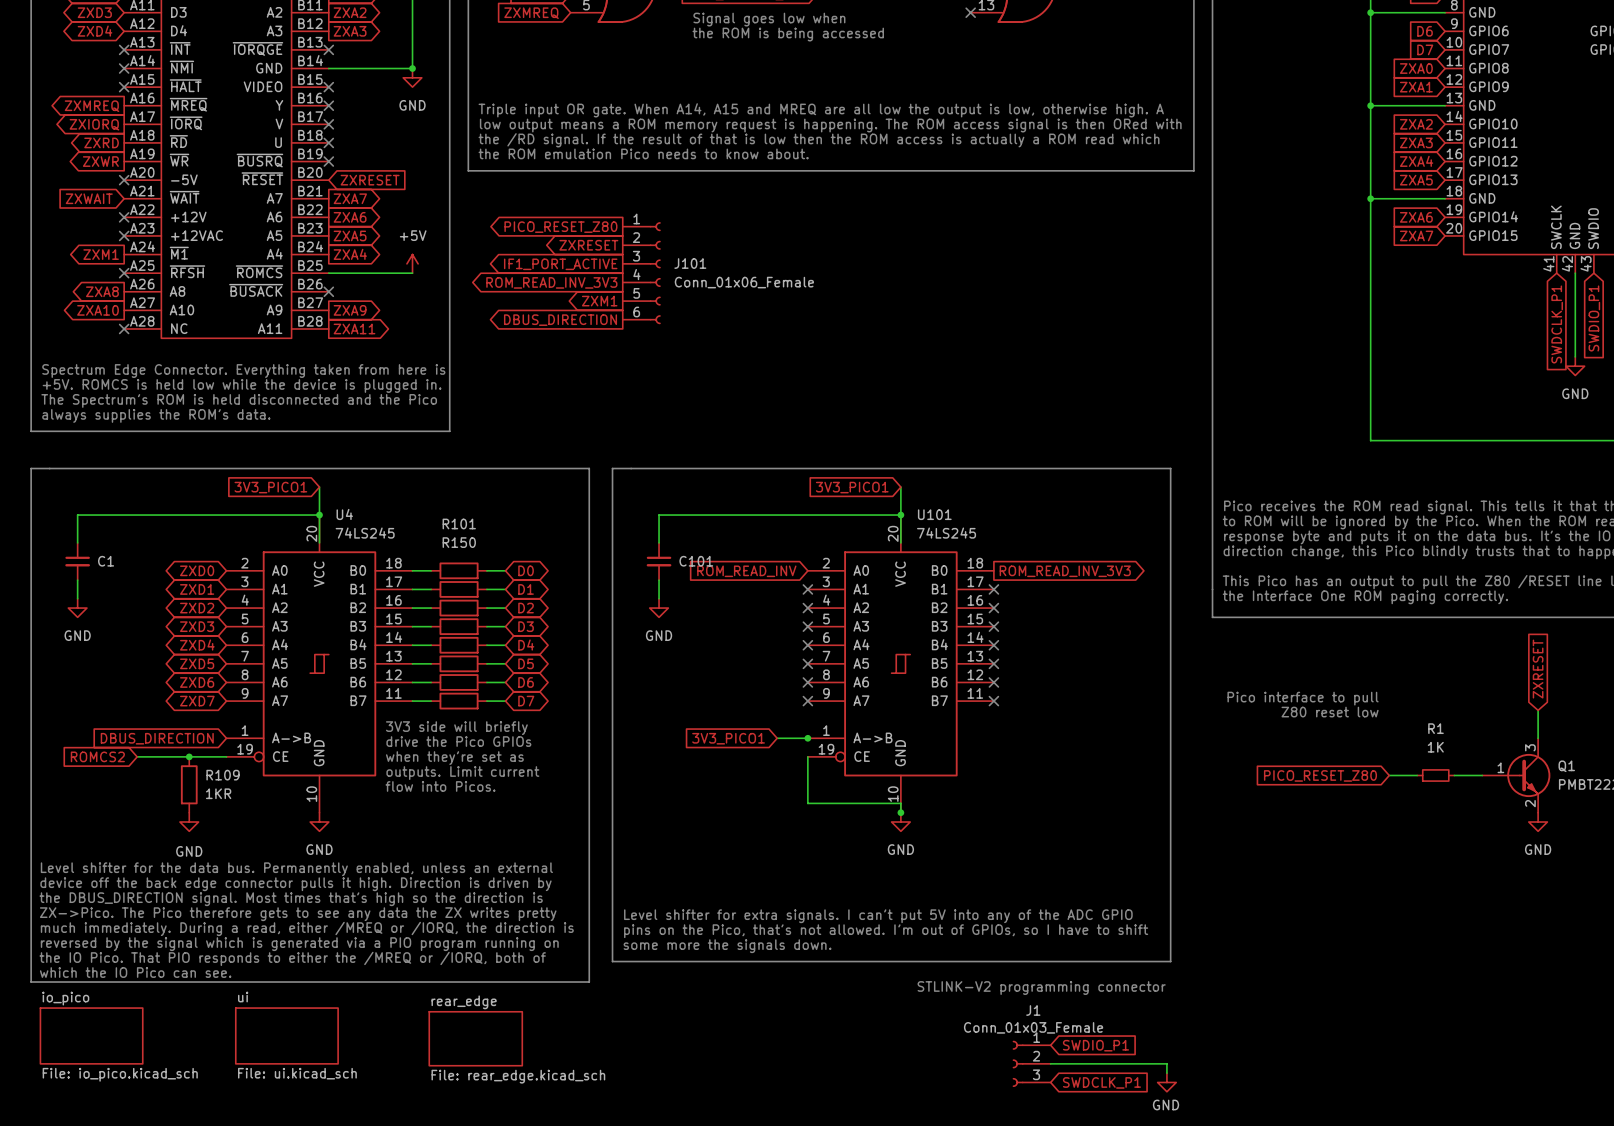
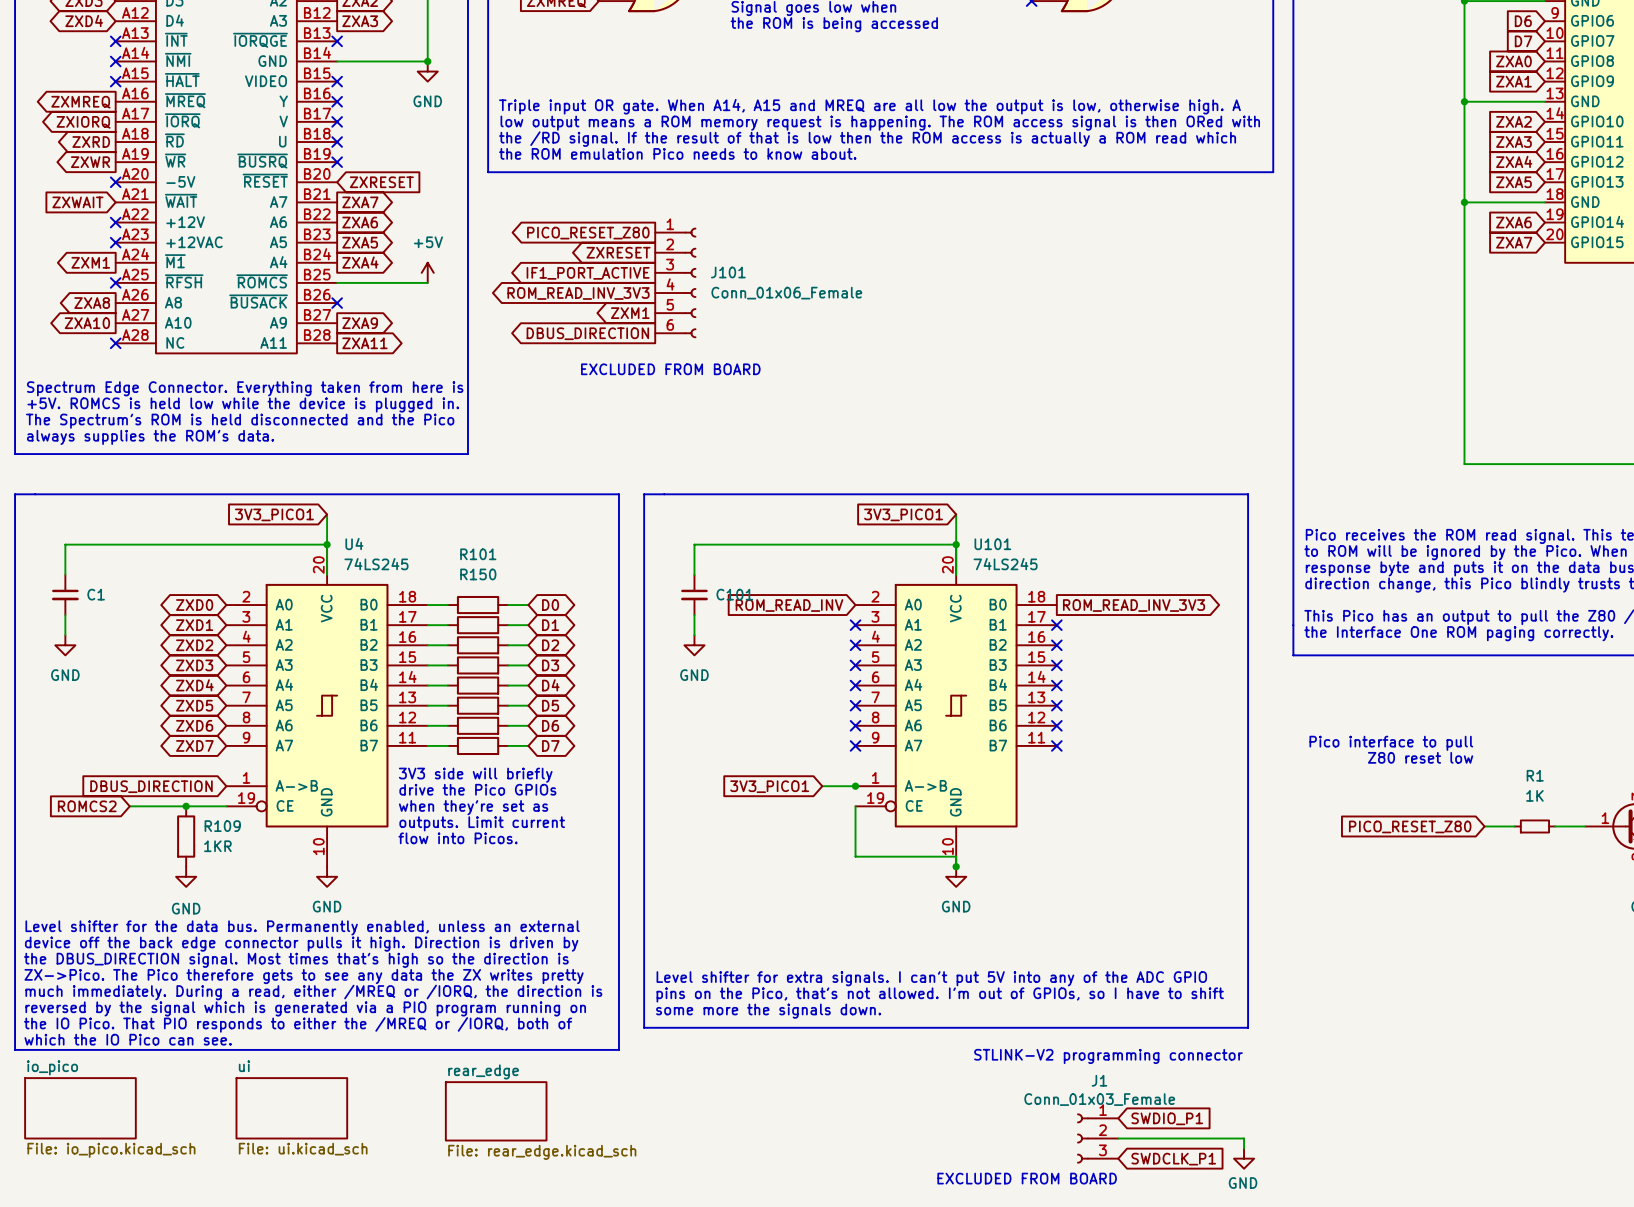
text: none -> EXCLUDED FROM BOARD (670, 369)
text: none -> EXCLUDED FROM BOARD (1027, 1178)

